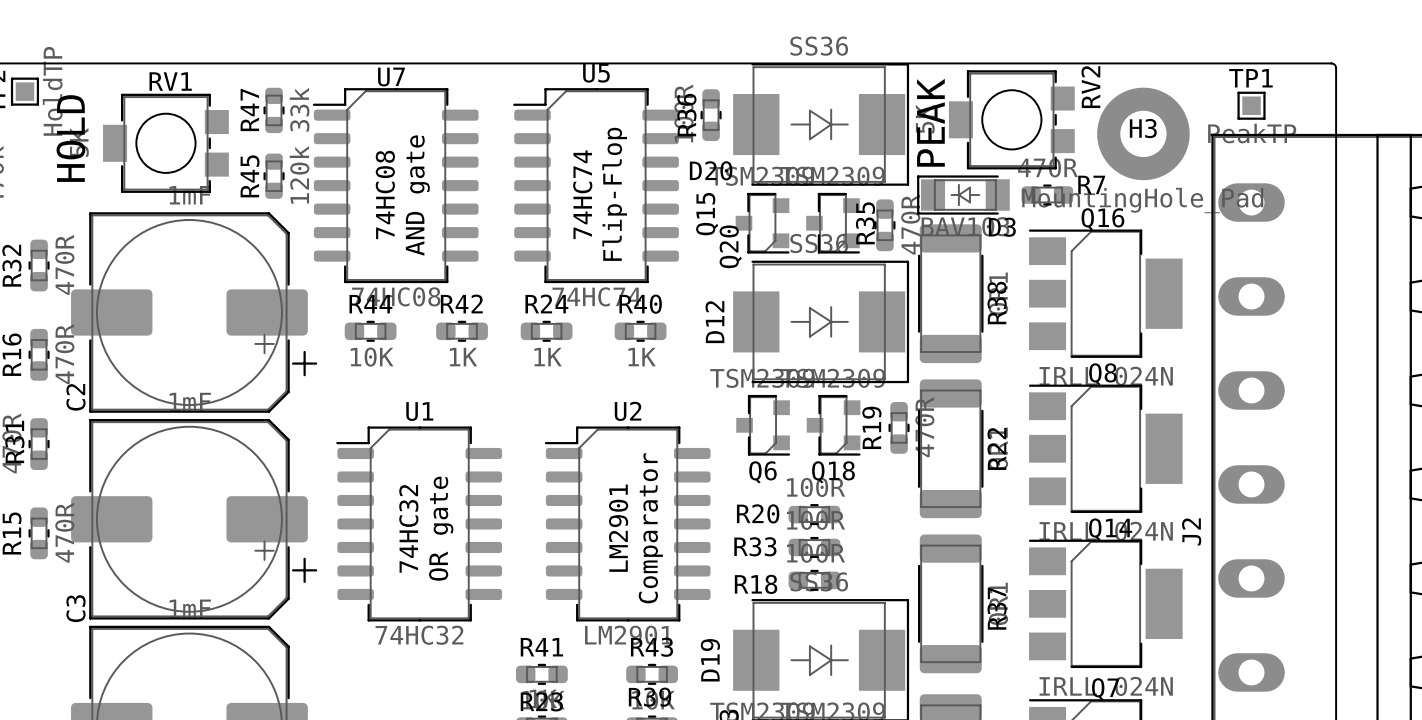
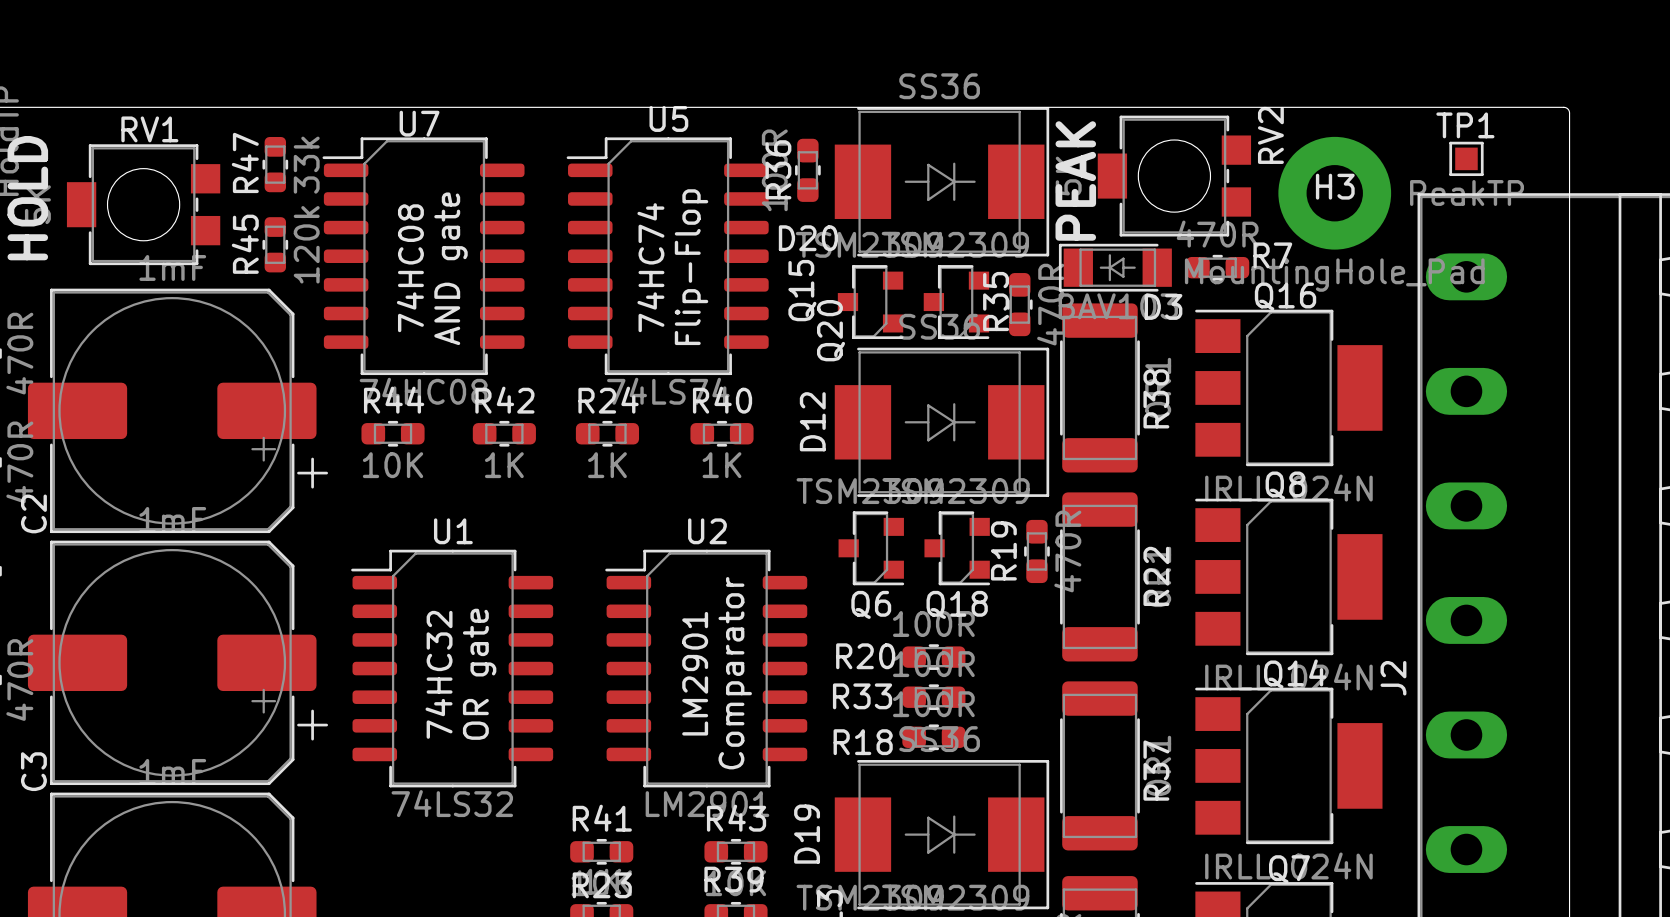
U5 value: 74HC74 (596, 296) -> 74LS74 (668, 391)
U1 value: 74HC32 (419, 635) -> 74LS32 (452, 803)

